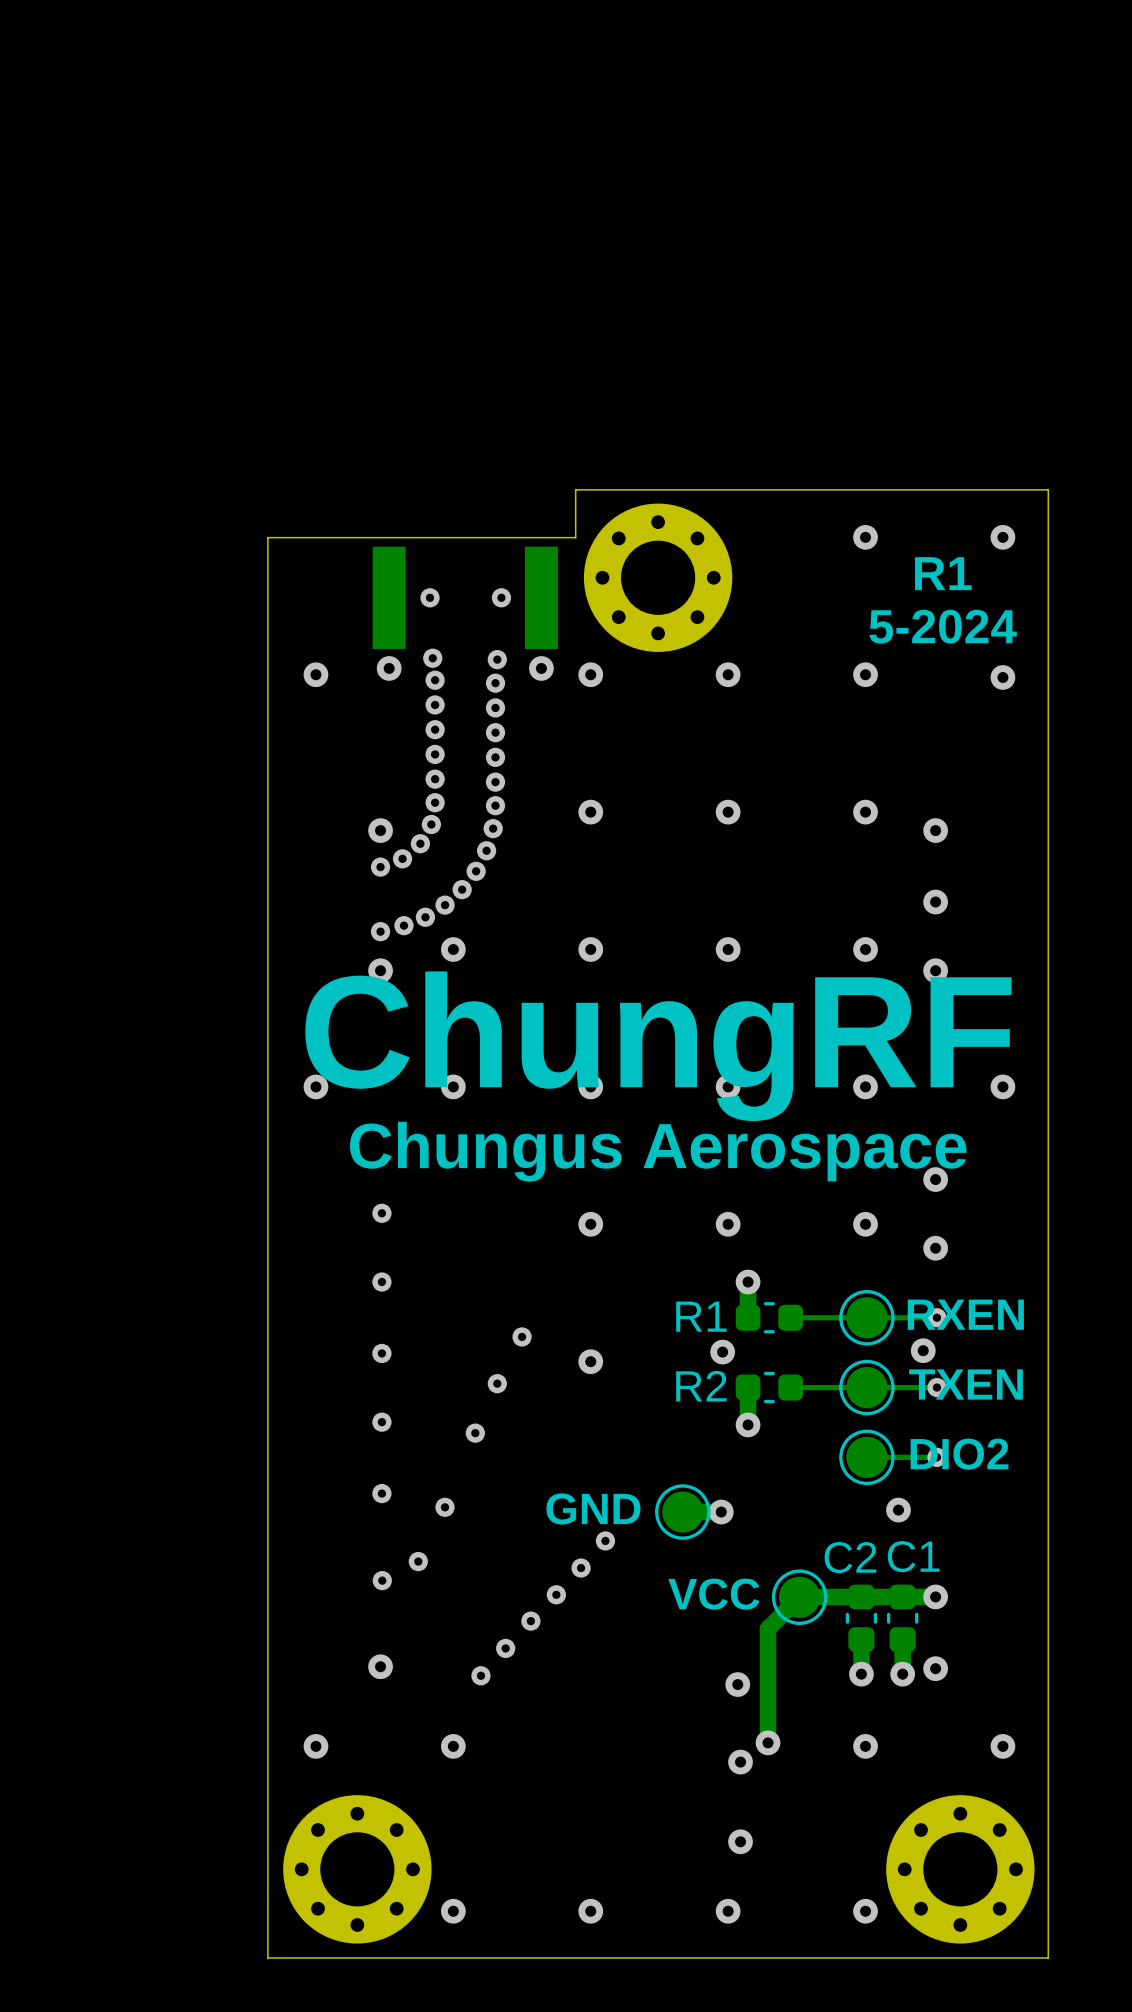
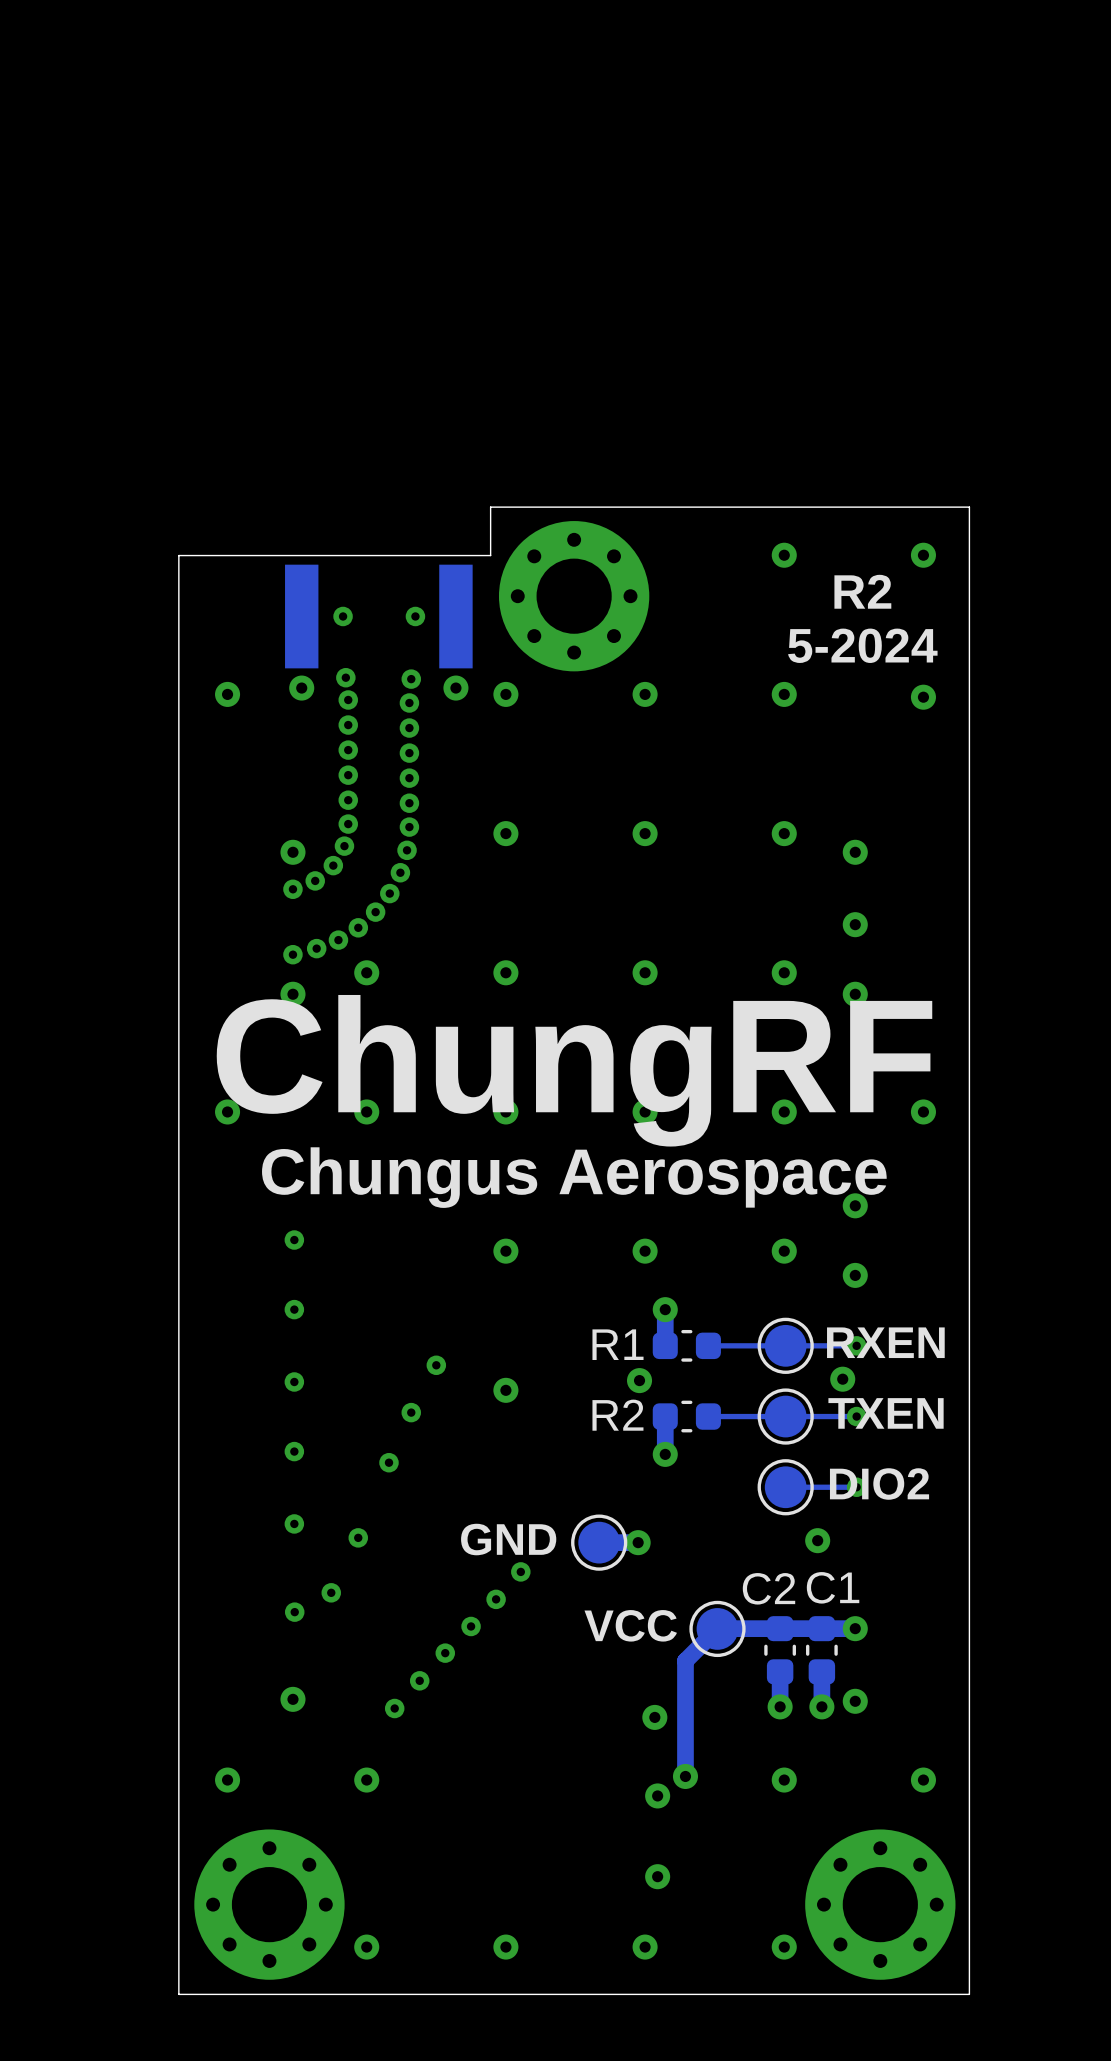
text: R1 (943, 573) -> R2 (862, 591)

